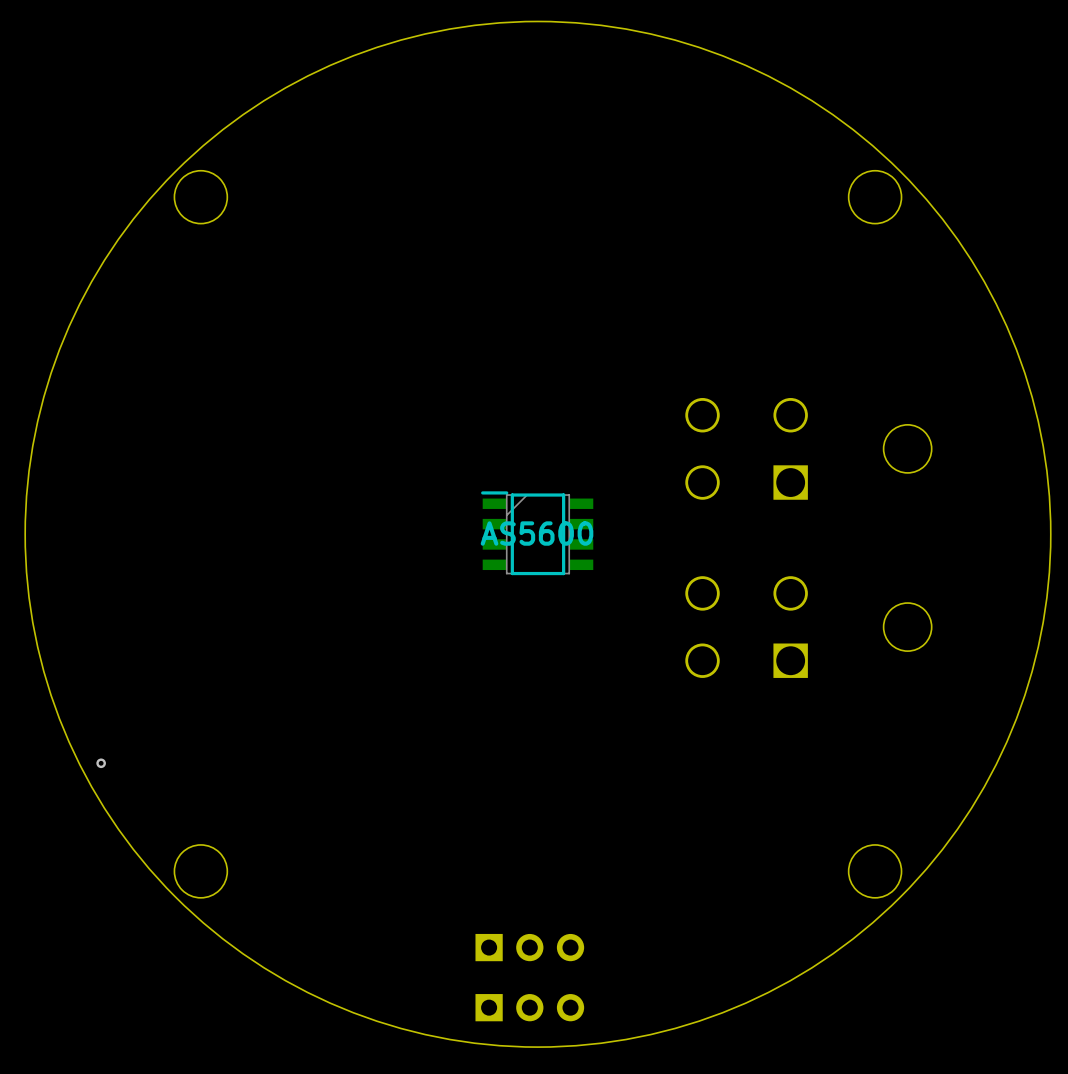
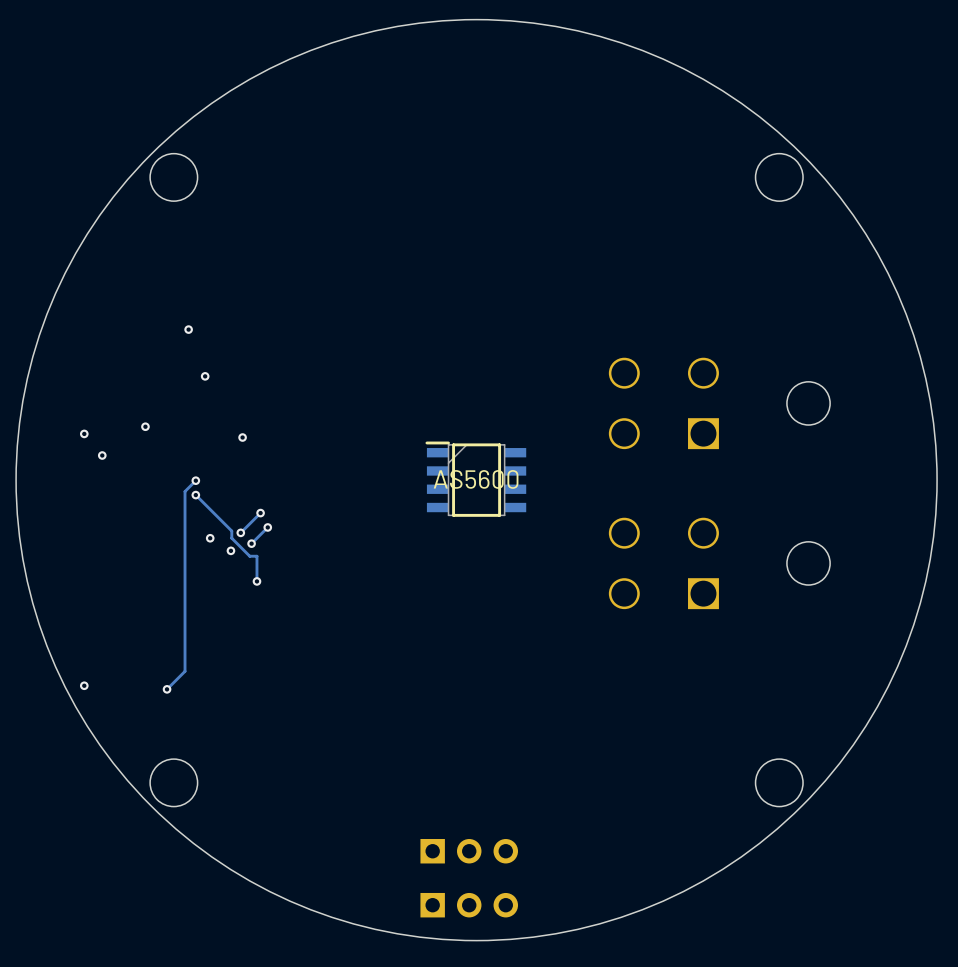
via: none -> (188, 329)
via: none -> (205, 376)
via: none -> (145, 426)
via: none -> (84, 433)
via: none -> (242, 437)
via: none -> (102, 455)
track: none -> (195, 480) (185, 491) (185, 671) (167, 689)
via: none -> (195, 480)
track: none -> (195, 495) (231, 531) (231, 538) (249, 556) (256, 556) (256, 581)
via: none -> (195, 495)
track: none -> (260, 513) (240, 532)
via: none -> (260, 513)
track: none -> (267, 527) (251, 543)
via: none -> (267, 527)
via: none -> (240, 532)
via: none -> (210, 538)
via: none -> (251, 543)
via: none -> (230, 550)
via: none -> (256, 581)
via: none -> (167, 689)

